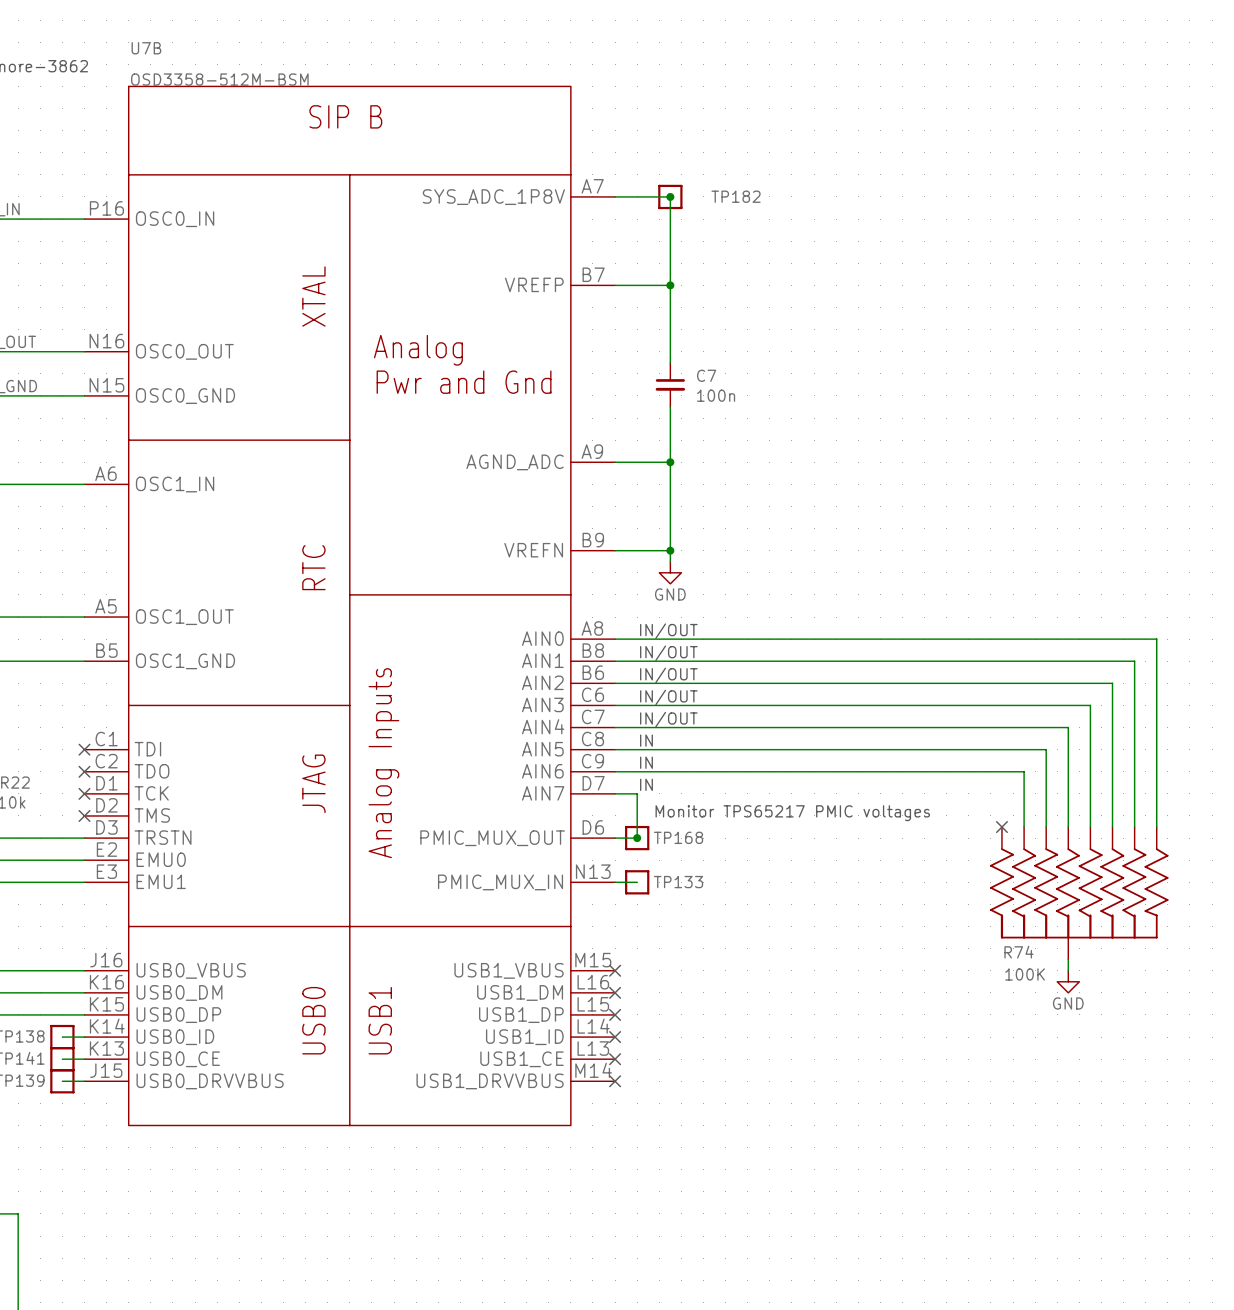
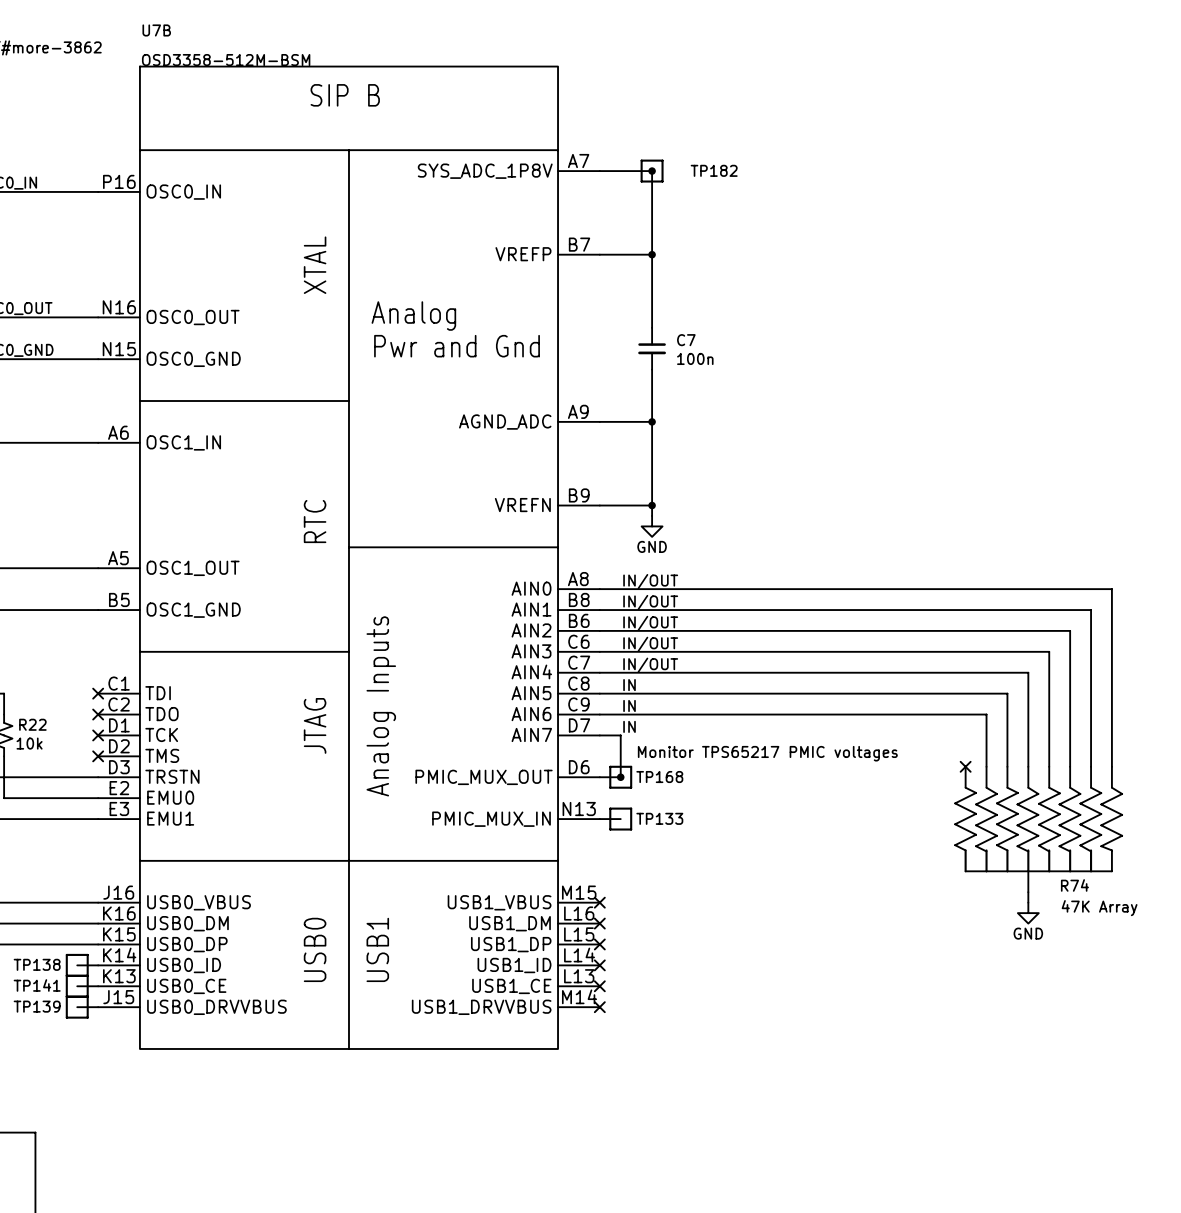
R74 name position: R74 (1018, 952) -> R74 (1074, 885)
R74 value: 100K (1025, 974) -> 47K Array (1099, 908)

